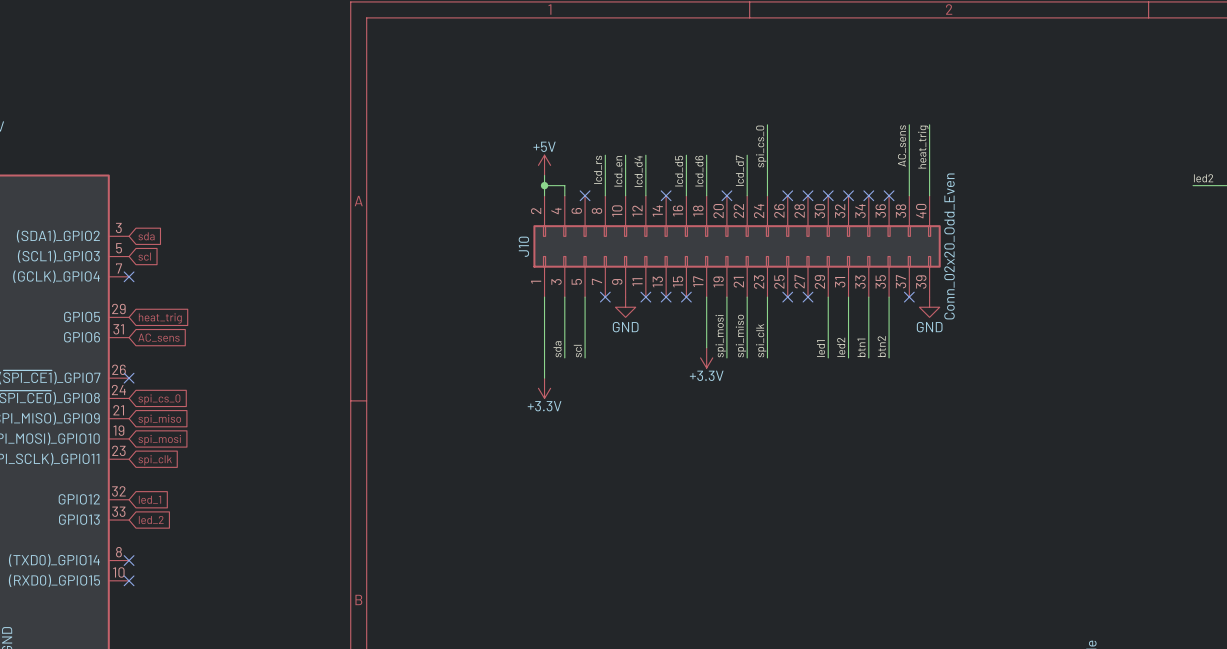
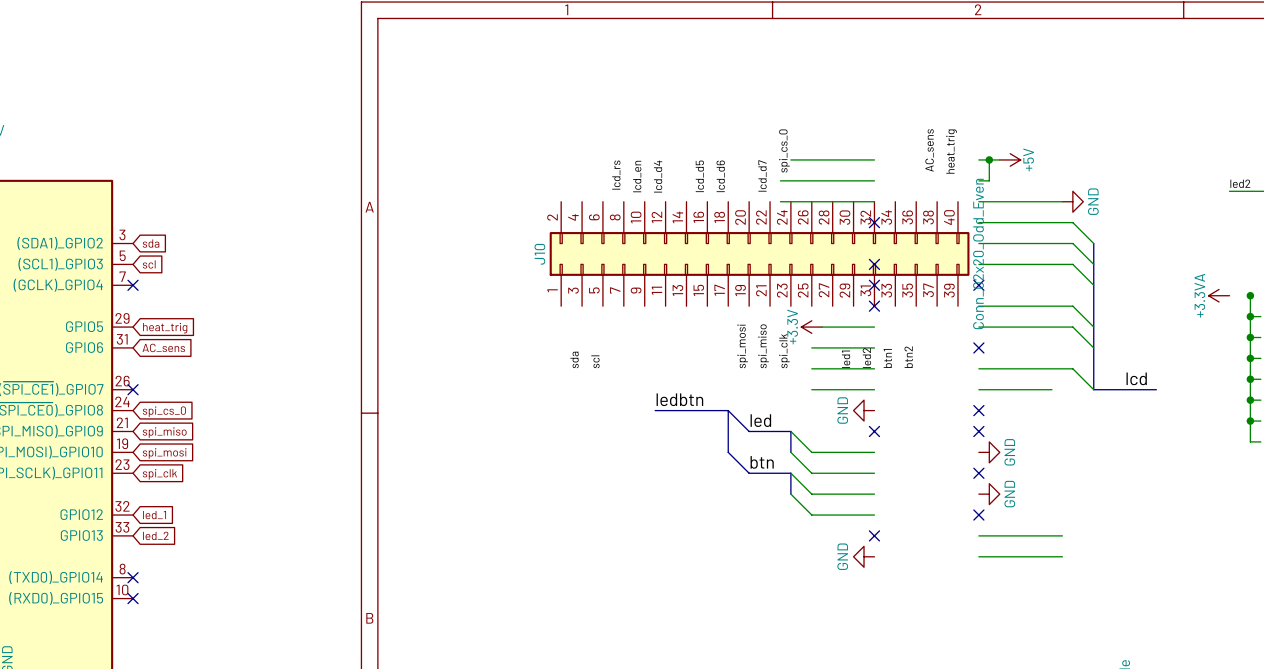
wire: (767, 124) (767, 195) -> none
wire: (909, 124) (909, 195) -> none
wire: (929, 124) (929, 195) -> none
wire: (605, 155) (605, 195) -> none
wire: (625, 155) (625, 195) -> none
wire: (645, 155) (645, 195) -> none
wire: (686, 155) (686, 195) -> none
wire: (706, 155) (706, 195) -> none
wire: (747, 155) (747, 195) -> none
wire: none -> (790, 159) (874, 159)
wire: none -> (978, 159) (999, 159)
wire: none -> (989, 159) (989, 180) (978, 180)
junction: none -> (989, 159)
power symbol: none -> +5V (1010, 159)
power symbol: +5V (544, 165) -> none
wire: (544, 175) (544, 195) -> none
wire: none -> (780, 180) (874, 180)
wire: (544, 185) (564, 185) (564, 195) -> none
junction: (544, 185) -> none
no-connect mark: (585, 195) -> none
no-connect mark: (666, 195) -> none
no-connect mark: (726, 195) -> none
wire: none -> (780, 201) (874, 201)
no-connect mark: (787, 195) -> none
no-connect mark: (807, 195) -> none
no-connect mark: (828, 195) -> none
no-connect mark: (848, 195) -> none
no-connect mark: (868, 195) -> none
no-connect mark: (889, 195) -> none
wire: none -> (978, 201) (1062, 201)
power symbol: none -> GND (1072, 201)
no-connect mark: none -> (874, 222)
wire: none -> (978, 222) (1072, 222) (1093, 243)
wire: none -> (978, 243) (1072, 243) (1093, 264)
bus: none -> (1093, 243) (1093, 389) (1156, 389)
no-connect mark: none -> (874, 264)
wire: none -> (978, 264) (1072, 264) (1093, 285)
no-connect mark: none -> (874, 285)
no-connect mark: none -> (978, 285)
power symbol: none -> +3.3VA (1219, 295)
wire: none -> (1250, 295) (1250, 441) (1260, 441)
junction: none -> (1250, 295)
wire: (544, 297) (544, 378) -> none
wire: (564, 297) (564, 357) -> none
wire: (585, 297) (585, 357) -> none
no-connect mark: (605, 297) -> none
no-connect mark: (645, 297) -> none
no-connect mark: (666, 297) -> none
no-connect mark: (686, 297) -> none
wire: (706, 297) (706, 347) -> none
wire: (726, 297) (726, 357) -> none
wire: (747, 297) (747, 357) -> none
wire: (767, 297) (767, 357) -> none
no-connect mark: (787, 297) -> none
no-connect mark: (807, 297) -> none
wire: (828, 297) (828, 357) -> none
wire: (848, 297) (848, 357) -> (811, 368) (874, 368)
no-connect mark: none -> (874, 306)
wire: (868, 297) (868, 357) -> none
wire: (889, 297) (889, 357) -> none
no-connect mark: (909, 297) -> none
wire: none -> (978, 306) (1072, 306) (1093, 327)
power symbol: GND (625, 307) -> none
power symbol: GND (929, 307) -> none
wire: none -> (1250, 316) (1260, 316)
junction: none -> (1250, 316)
wire: none -> (822, 327) (874, 327)
wire: none -> (978, 327) (1072, 327) (1093, 347)
wire: none -> (1250, 337) (1260, 337)
junction: none -> (1250, 337)
wire: none -> (811, 347) (874, 347)
no-connect mark: none -> (978, 347)
wire: none -> (1250, 358) (1260, 358)
junction: none -> (1250, 358)
power symbol rotation: 0° (706, 357) -> 90° clockwise (811, 327)
power symbol position: +3.3V (706, 357) -> +3.3V (811, 327)
wire: none -> (978, 368) (1072, 368) (1093, 389)
label: none -> lcd (1136, 378)
wire: none -> (1250, 379) (1260, 379)
junction: none -> (1250, 379)
wire: none -> (811, 389) (874, 389)
wire: none -> (978, 389) (1051, 389)
label: none -> ledbtn (679, 399)
power symbol: +3.3V (544, 388) -> none
wire: none -> (1250, 400) (1260, 400)
junction: none -> (1250, 400)
bus: none -> (655, 410) (728, 410)
bus: none -> (728, 410) (749, 431) (790, 431) (790, 452)
bus: none -> (728, 410) (728, 452) (749, 473) (790, 473) (790, 494)
power symbol: none -> GND (864, 410)
no-connect mark: none -> (978, 410)
label: none -> led (760, 420)
wire: none -> (1250, 421) (1260, 421)
junction: none -> (1250, 421)
wire: none -> (790, 431) (811, 452) (874, 452)
no-connect mark: none -> (874, 431)
no-connect mark: none -> (978, 431)
wire: none -> (790, 452) (811, 473) (874, 473)
power symbol: none -> GND (989, 452)
label: none -> btn (762, 462)
wire: none -> (790, 473) (811, 494) (874, 494)
no-connect mark: none -> (978, 473)
wire: none -> (790, 494) (811, 515) (874, 515)
power symbol: none -> GND (989, 494)
no-connect mark: none -> (978, 515)
no-connect mark: none -> (874, 535)
wire: none -> (978, 535) (1062, 535)
power symbol: none -> GND (864, 556)
wire: none -> (978, 556) (1062, 556)

